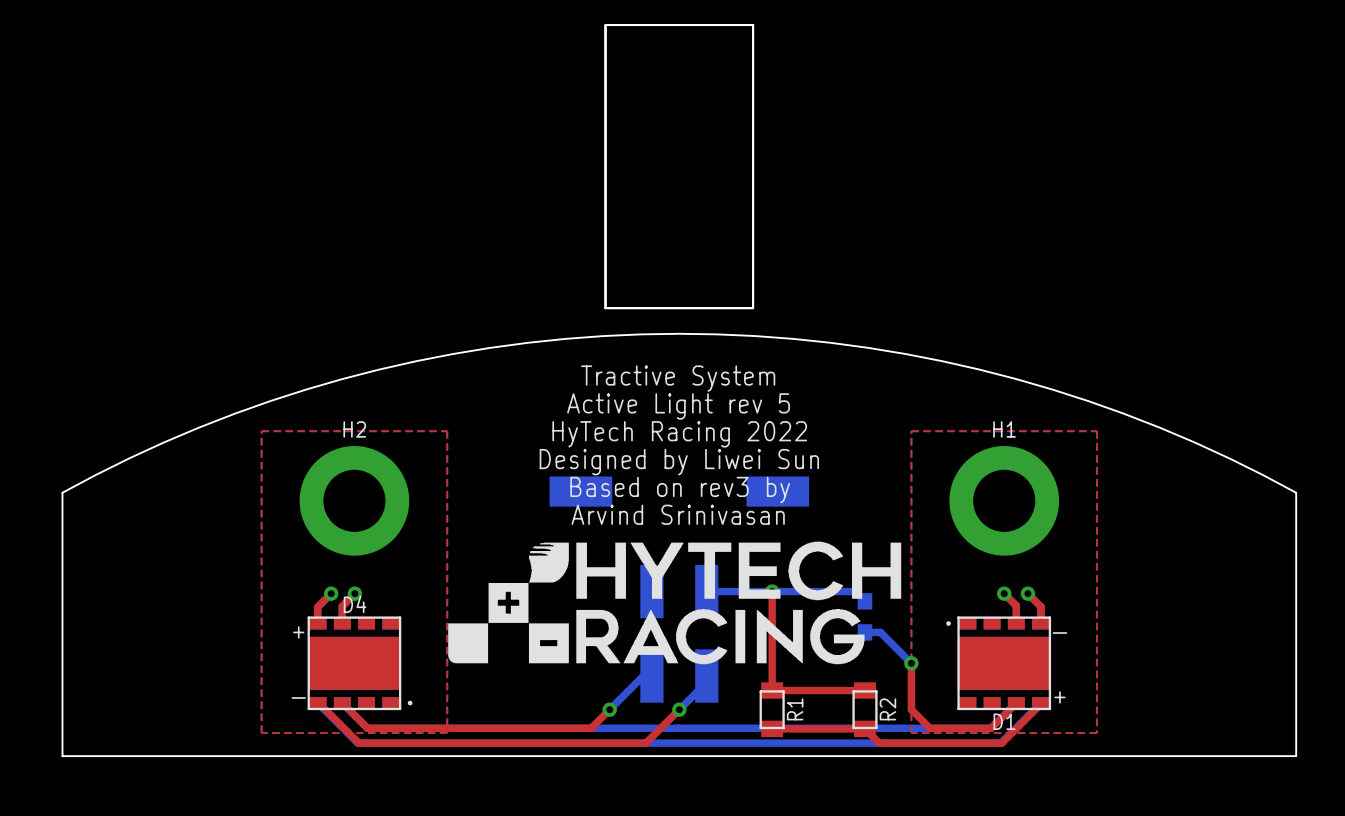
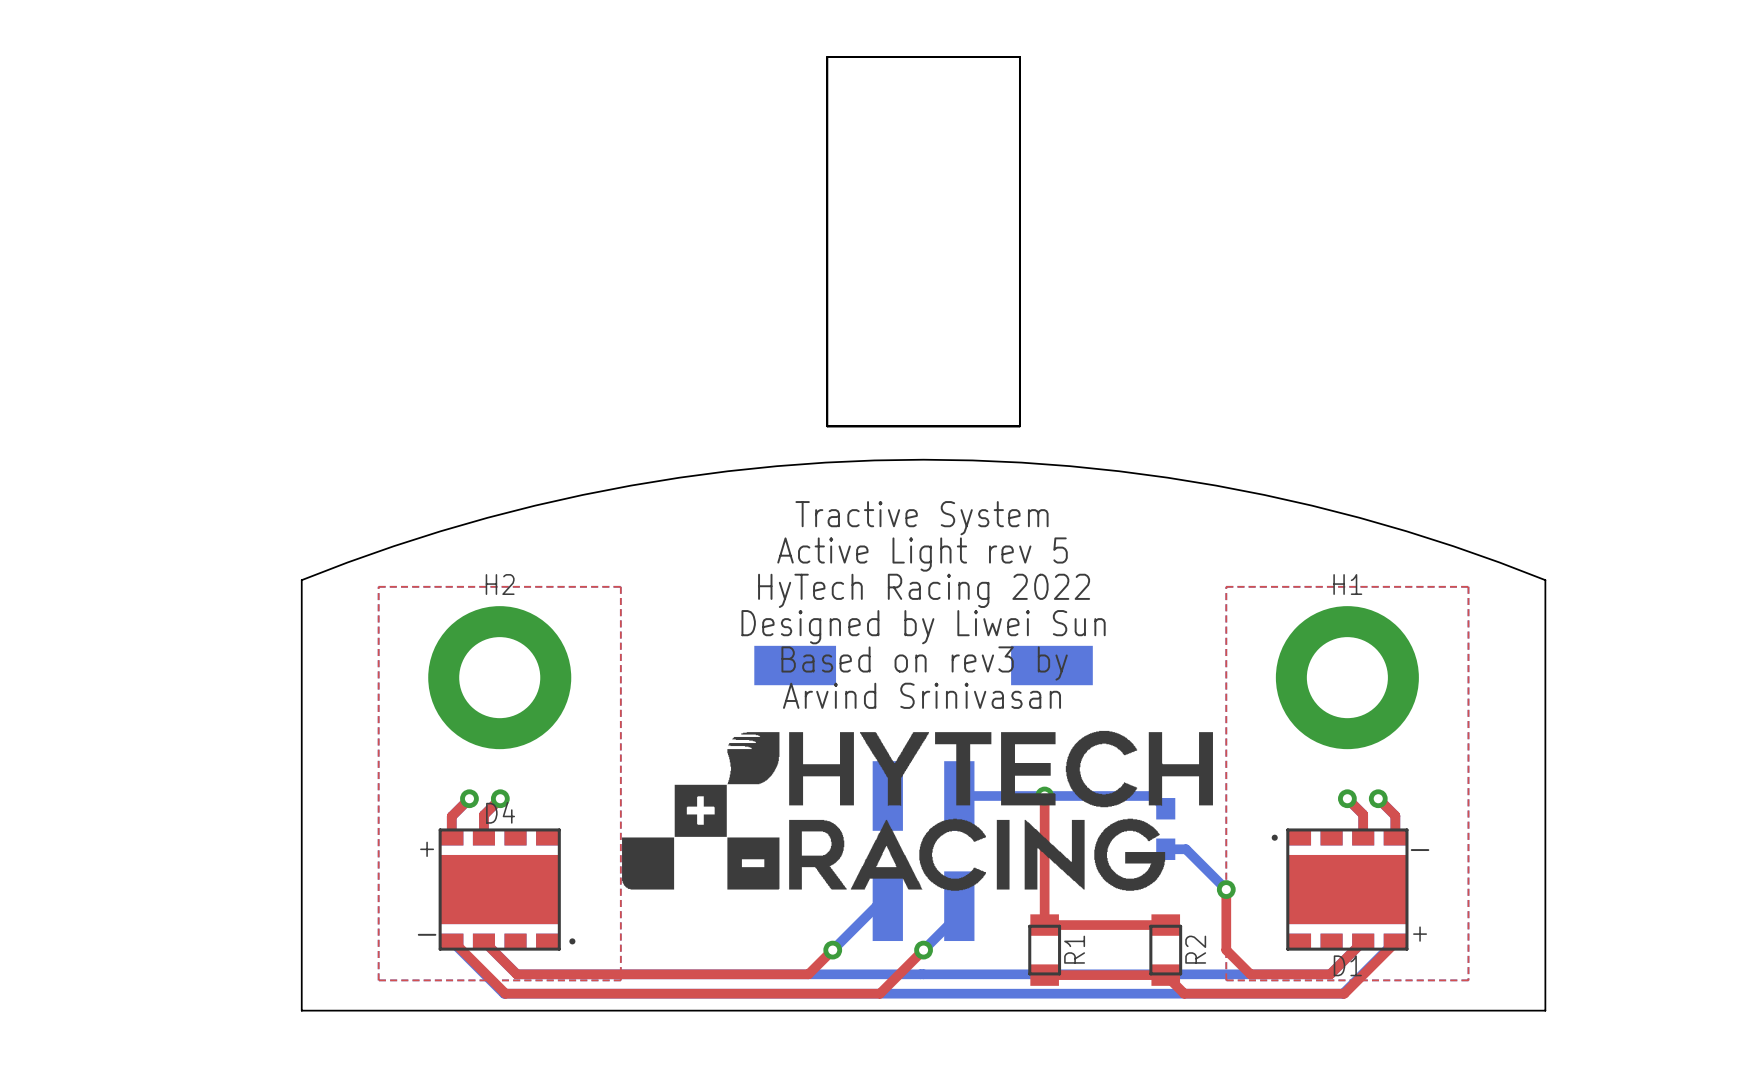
board edge: (202, 756) (62, 756) (62, 492) (129, 458) (199, 427) (270, 401) (342, 379) (416, 361) (490, 347) (603, 336) (679, 333) (755, 336) (867, 347) (942, 361) (1016, 379) (1088, 401) (1159, 427) (1228, 458) (1296, 492) (1296, 756) (1156, 756) -> (301, 1010) (301, 580) (393, 546) (487, 517) (630, 485) (776, 466) (923, 459) (1070, 466) (1216, 485) (1359, 517) (1453, 546) (1545, 580) (1545, 1010)

